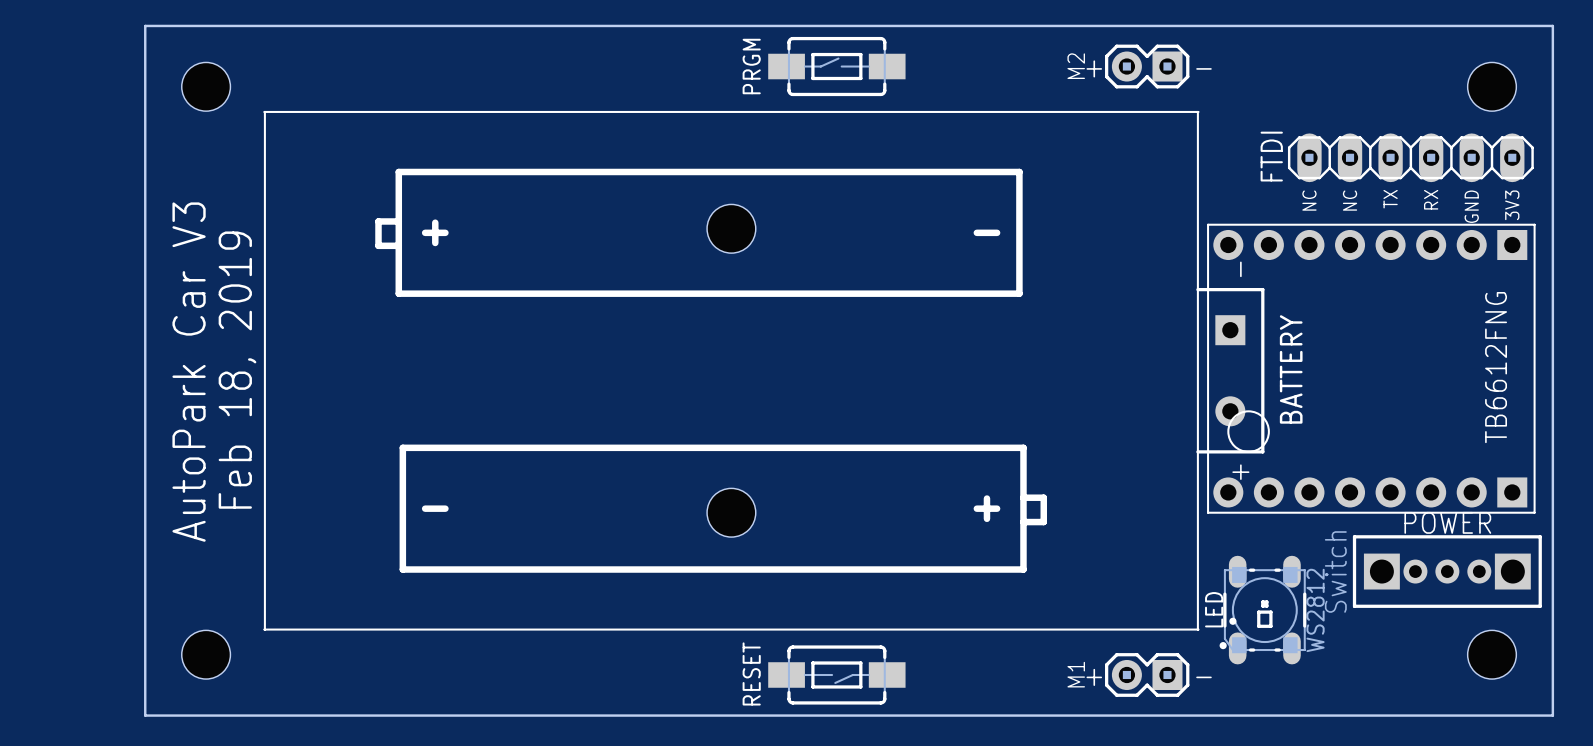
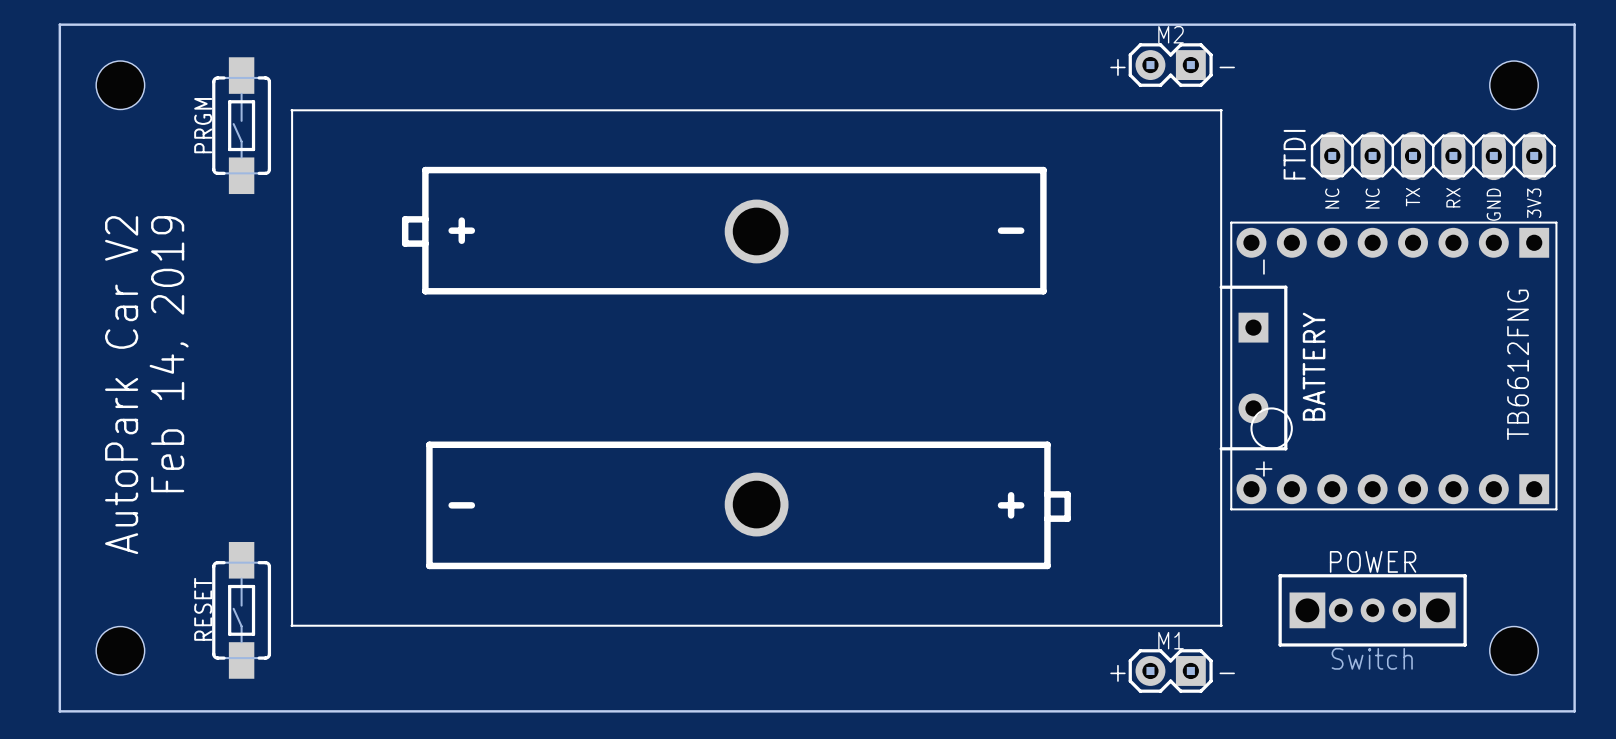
board edge: (145, 25) (145, 715) -> (172, 24) (59, 24) (59, 711) (172, 711)
PRGM: (836, 66) -> none
M2 name rotation: 0° (1076, 66) -> 90° clockwise (1171, 34)
M2 name position: M2 (1076, 66) -> M2 (1171, 34)
hole position: (206, 86) -> (120, 85)
BATTERY footprint: [263, 110, 1265, 631] -> [290, 109, 1288, 627]
PRGM: none -> (241, 125)
text: none -> Feb 14, 2019 (169, 354)
text: Feb 18, 2019 (237, 370) -> none
text: AutoPark Car V3 (189, 372) -> none
text: none -> AutoPark Car V2 (121, 385)
POWER value rotation: 0° (1335, 571) -> 90° clockwise (1372, 658)
POWER position: (1447, 571) -> (1372, 610)
LED: WS2812 (1262, 610) -> none
RESET: none -> (241, 610)
hole position: (206, 654) -> (120, 650)
RESET: (836, 674) -> none
M1 name rotation: 0° (1076, 674) -> 90° clockwise (1171, 640)
M1 name position: M1 (1076, 674) -> M1 (1171, 640)

